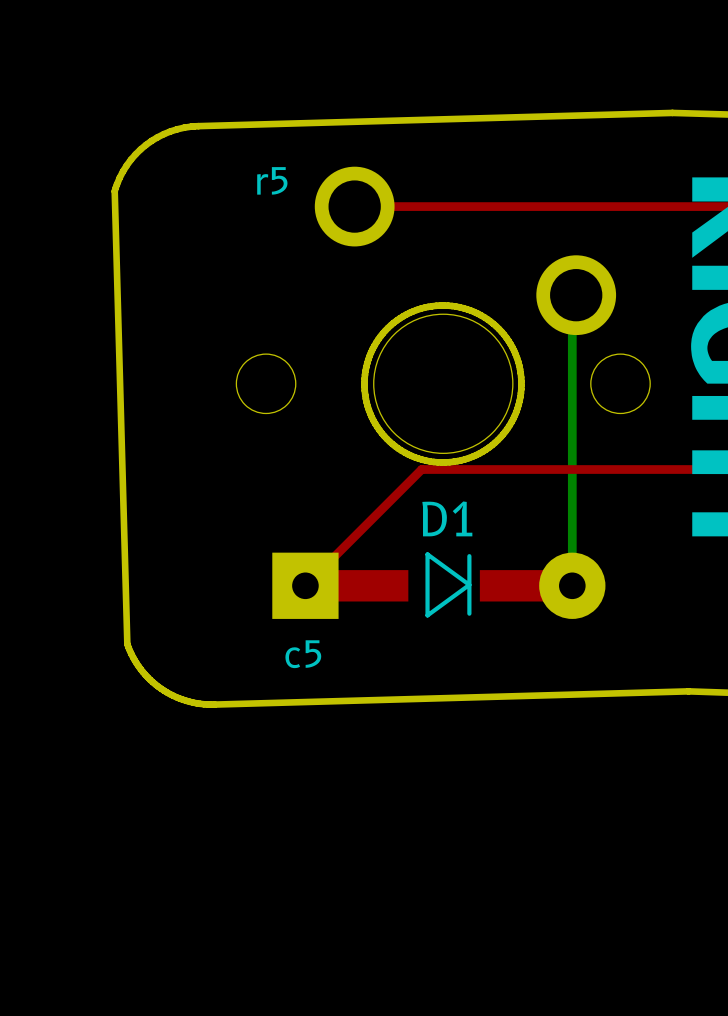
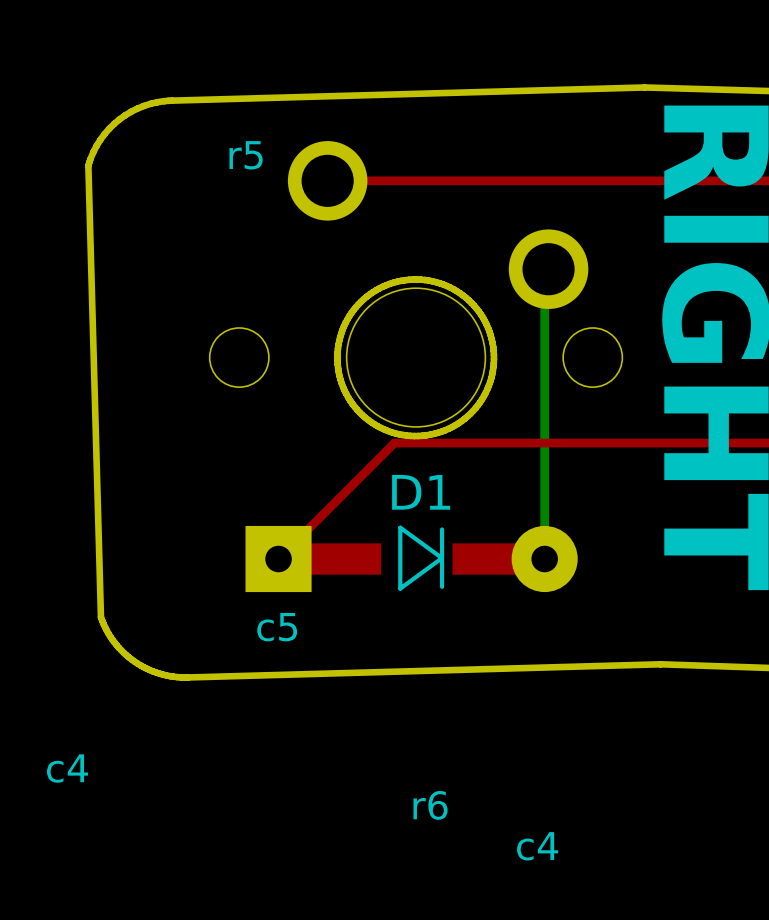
text: none -> c4 (67, 768)
text: none -> r6 (430, 805)
text: none -> c4 (537, 846)

